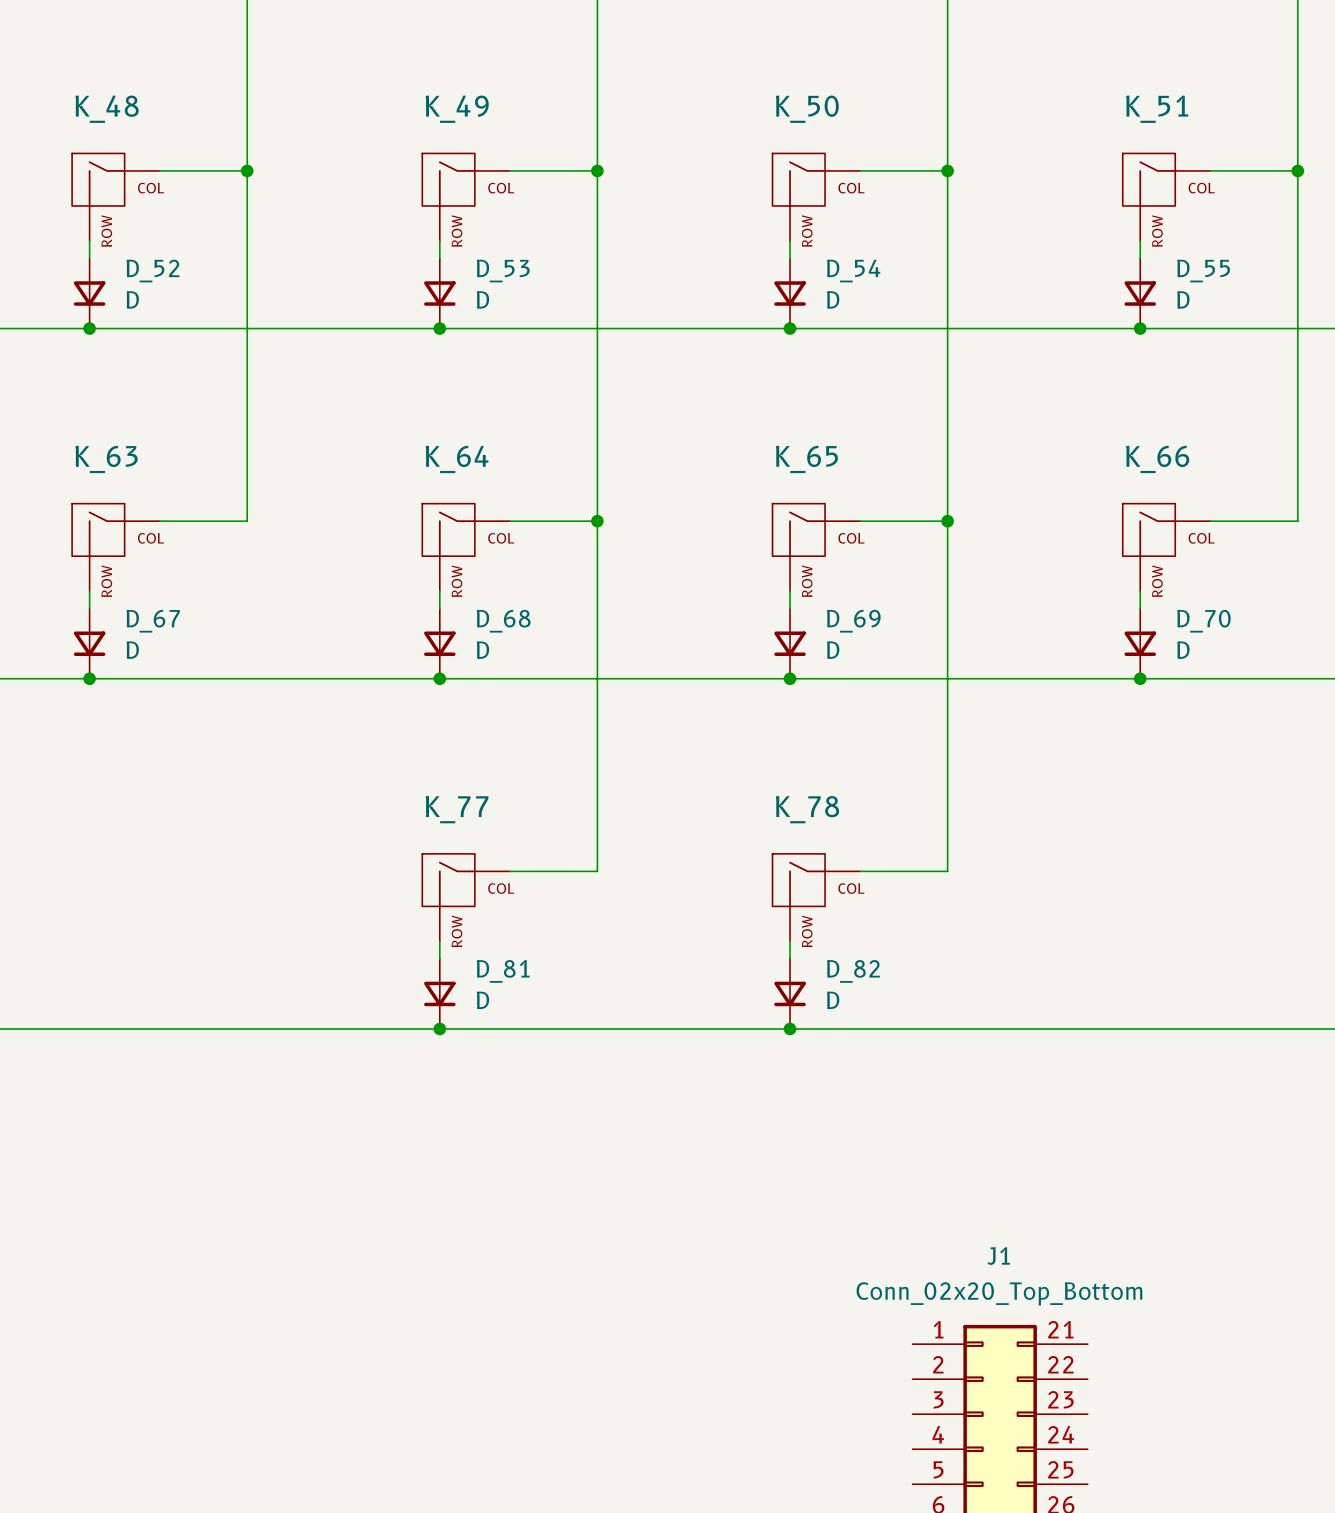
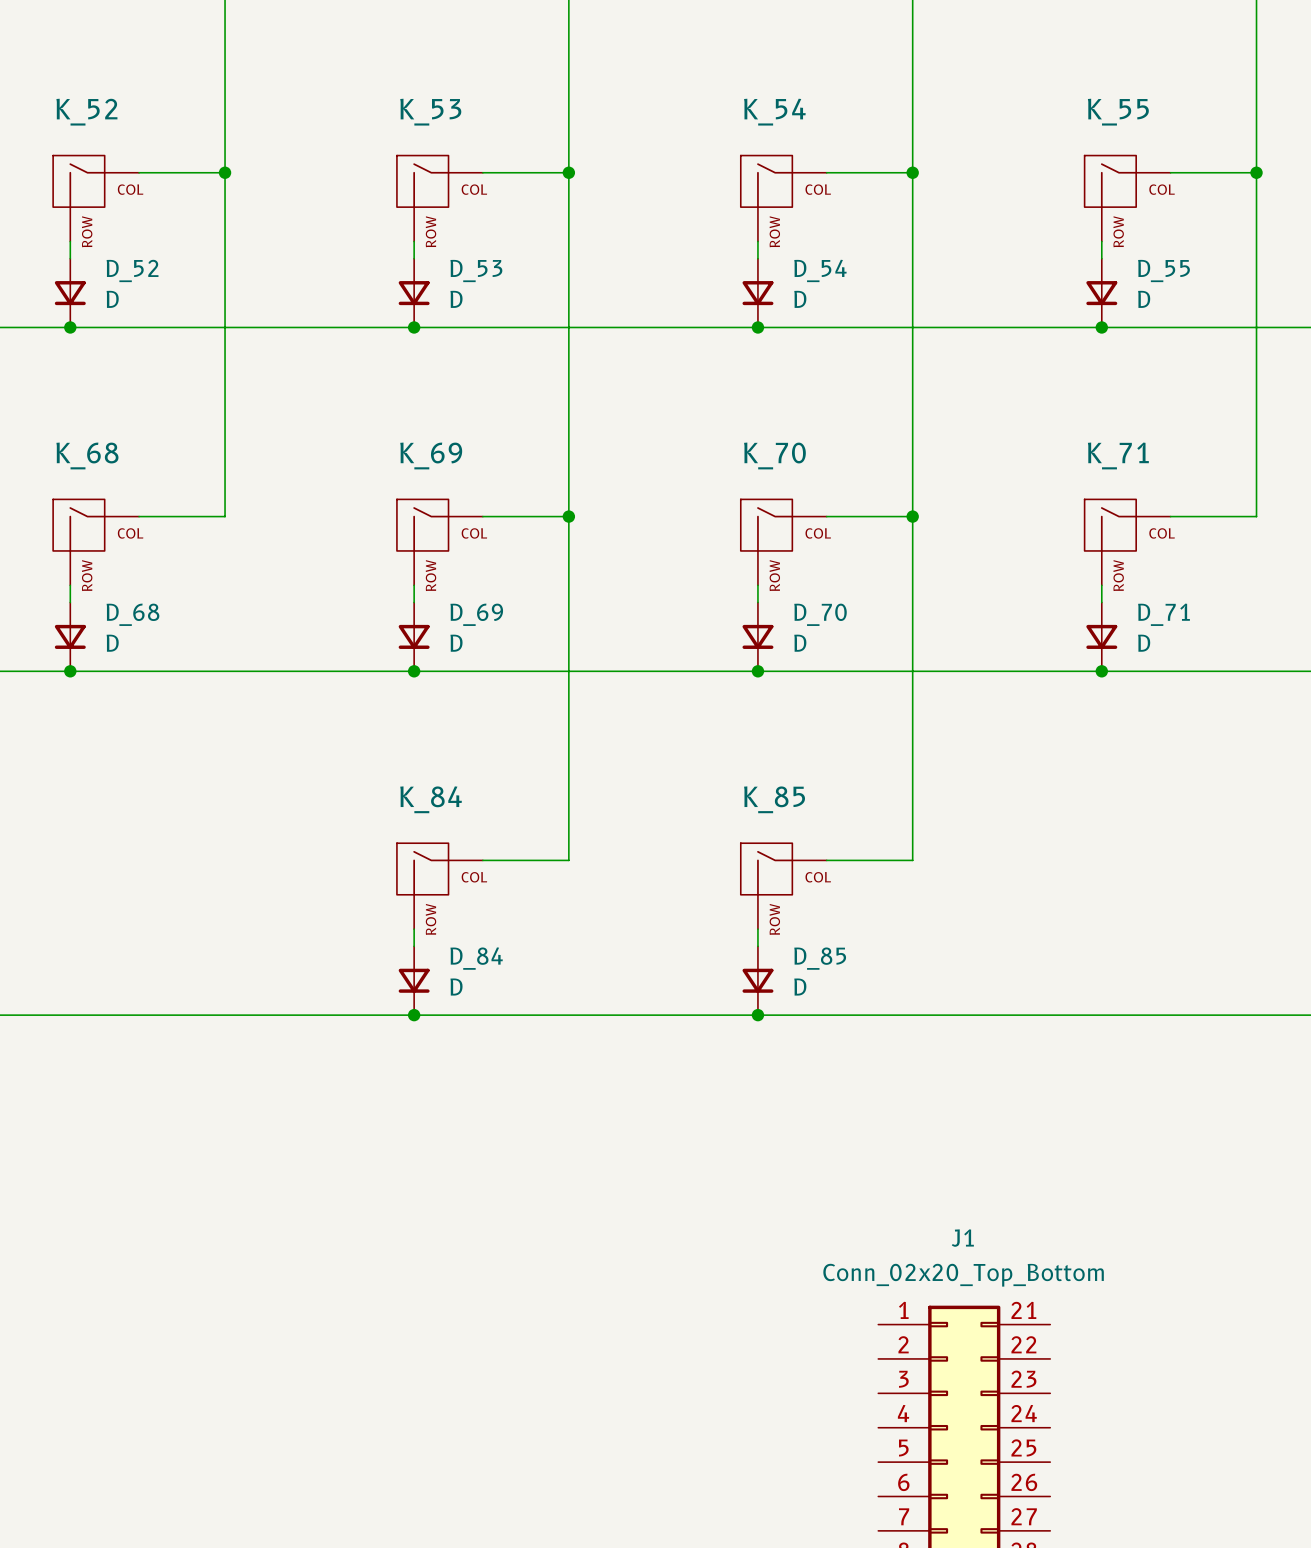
K_48 name: K_48 (107, 109) -> K_52 (86, 112)
K_49 name: K_49 (457, 109) -> K_53 (430, 112)
K_50 name: K_50 (807, 109) -> K_54 (774, 112)
K_51 name: K_51 (1157, 109) -> K_55 (1118, 112)
K_63 name: K_63 (106, 459) -> K_68 (87, 455)
K_64 name: K_64 (457, 459) -> K_69 (431, 455)
K_65 name: K_65 (806, 459) -> K_70 (774, 455)
K_66 name: K_66 (1157, 459) -> K_71 (1118, 455)
D_67 name: D_67 (153, 621) -> D_68 (132, 614)
D_68 name: D_68 (503, 621) -> D_69 (476, 614)
D_69 name: D_69 (853, 621) -> D_70 (820, 614)
D_70 name: D_70 (1203, 621) -> D_71 (1164, 614)
K_77 name: K_77 (457, 809) -> K_84 (431, 799)
K_78 name: K_78 (807, 809) -> K_85 (774, 799)
D_81 name: D_81 (503, 971) -> D_84 (476, 958)
D_82 name: D_82 (853, 971) -> D_85 (820, 958)

